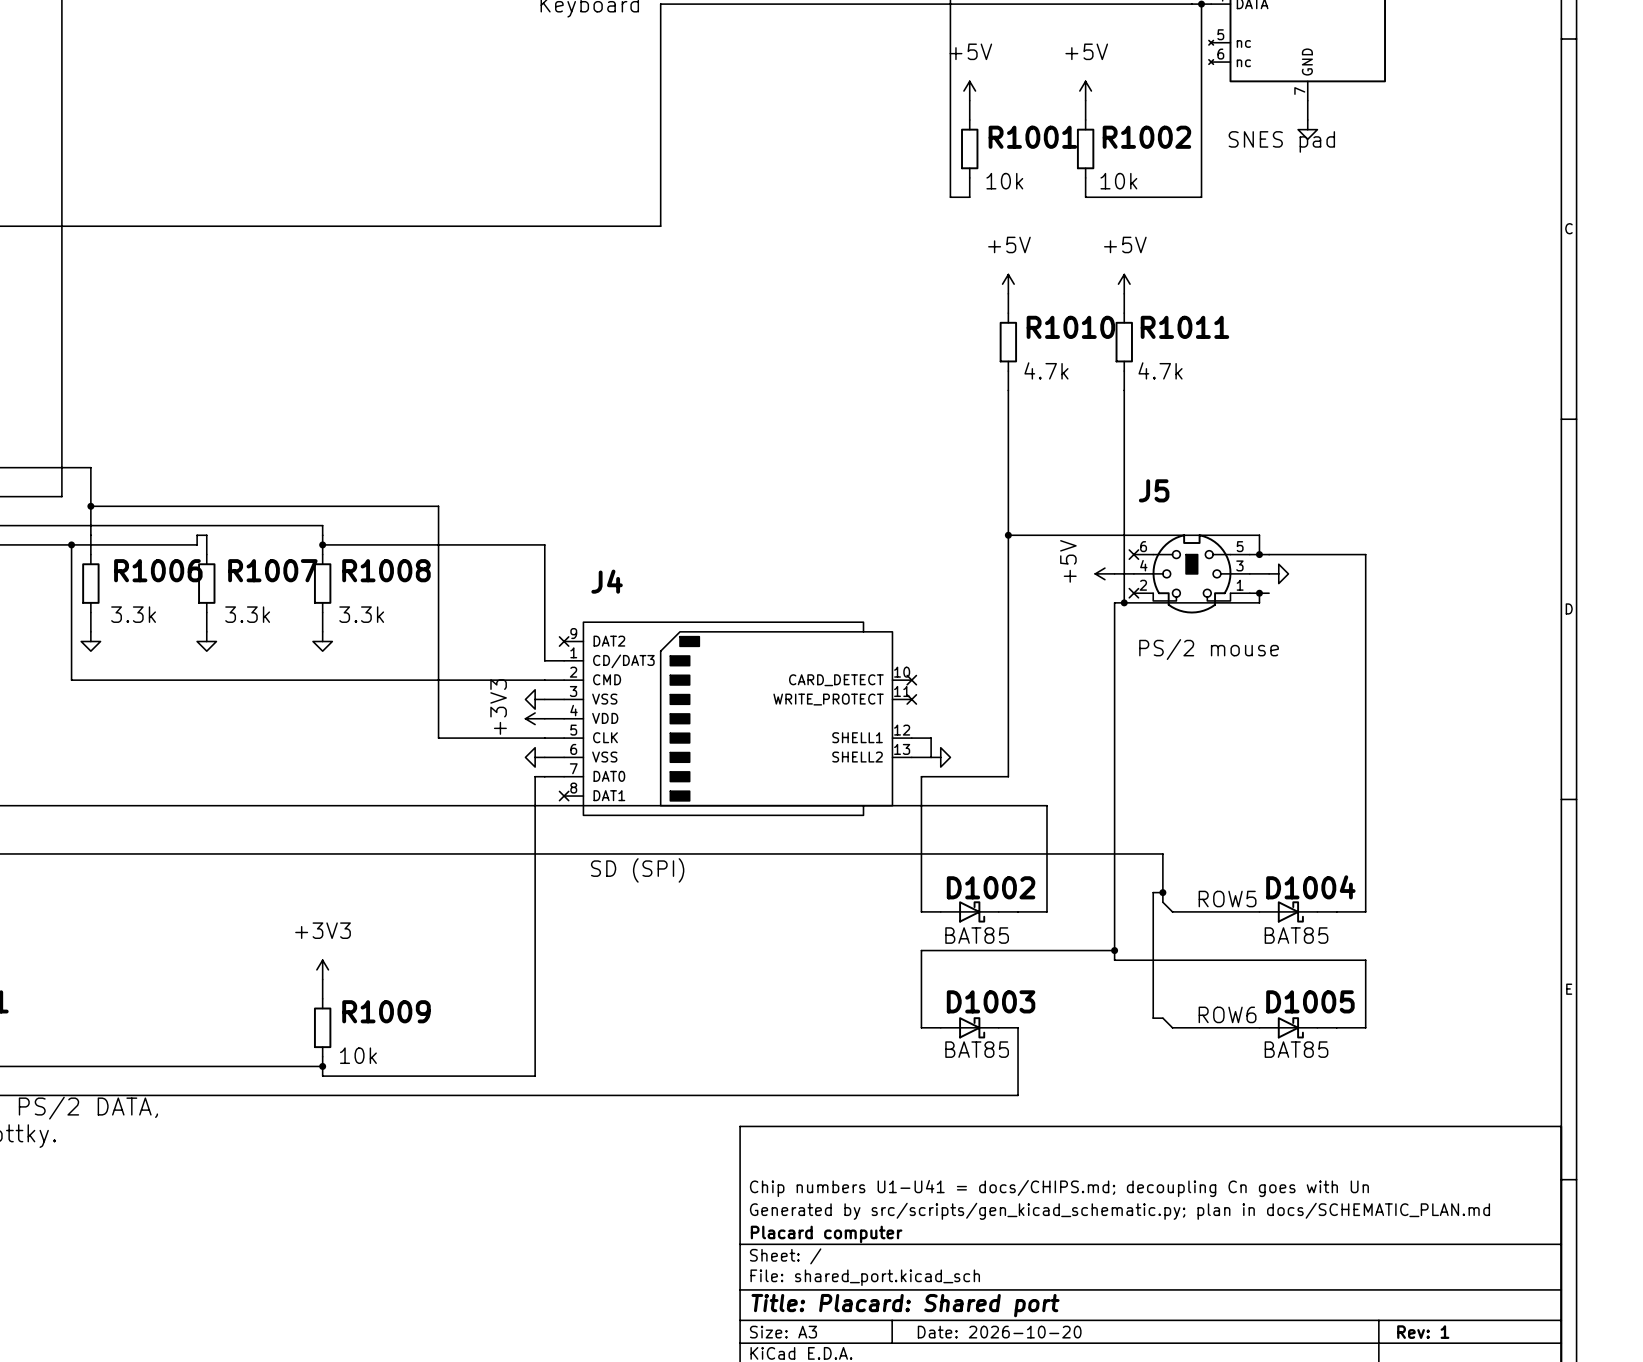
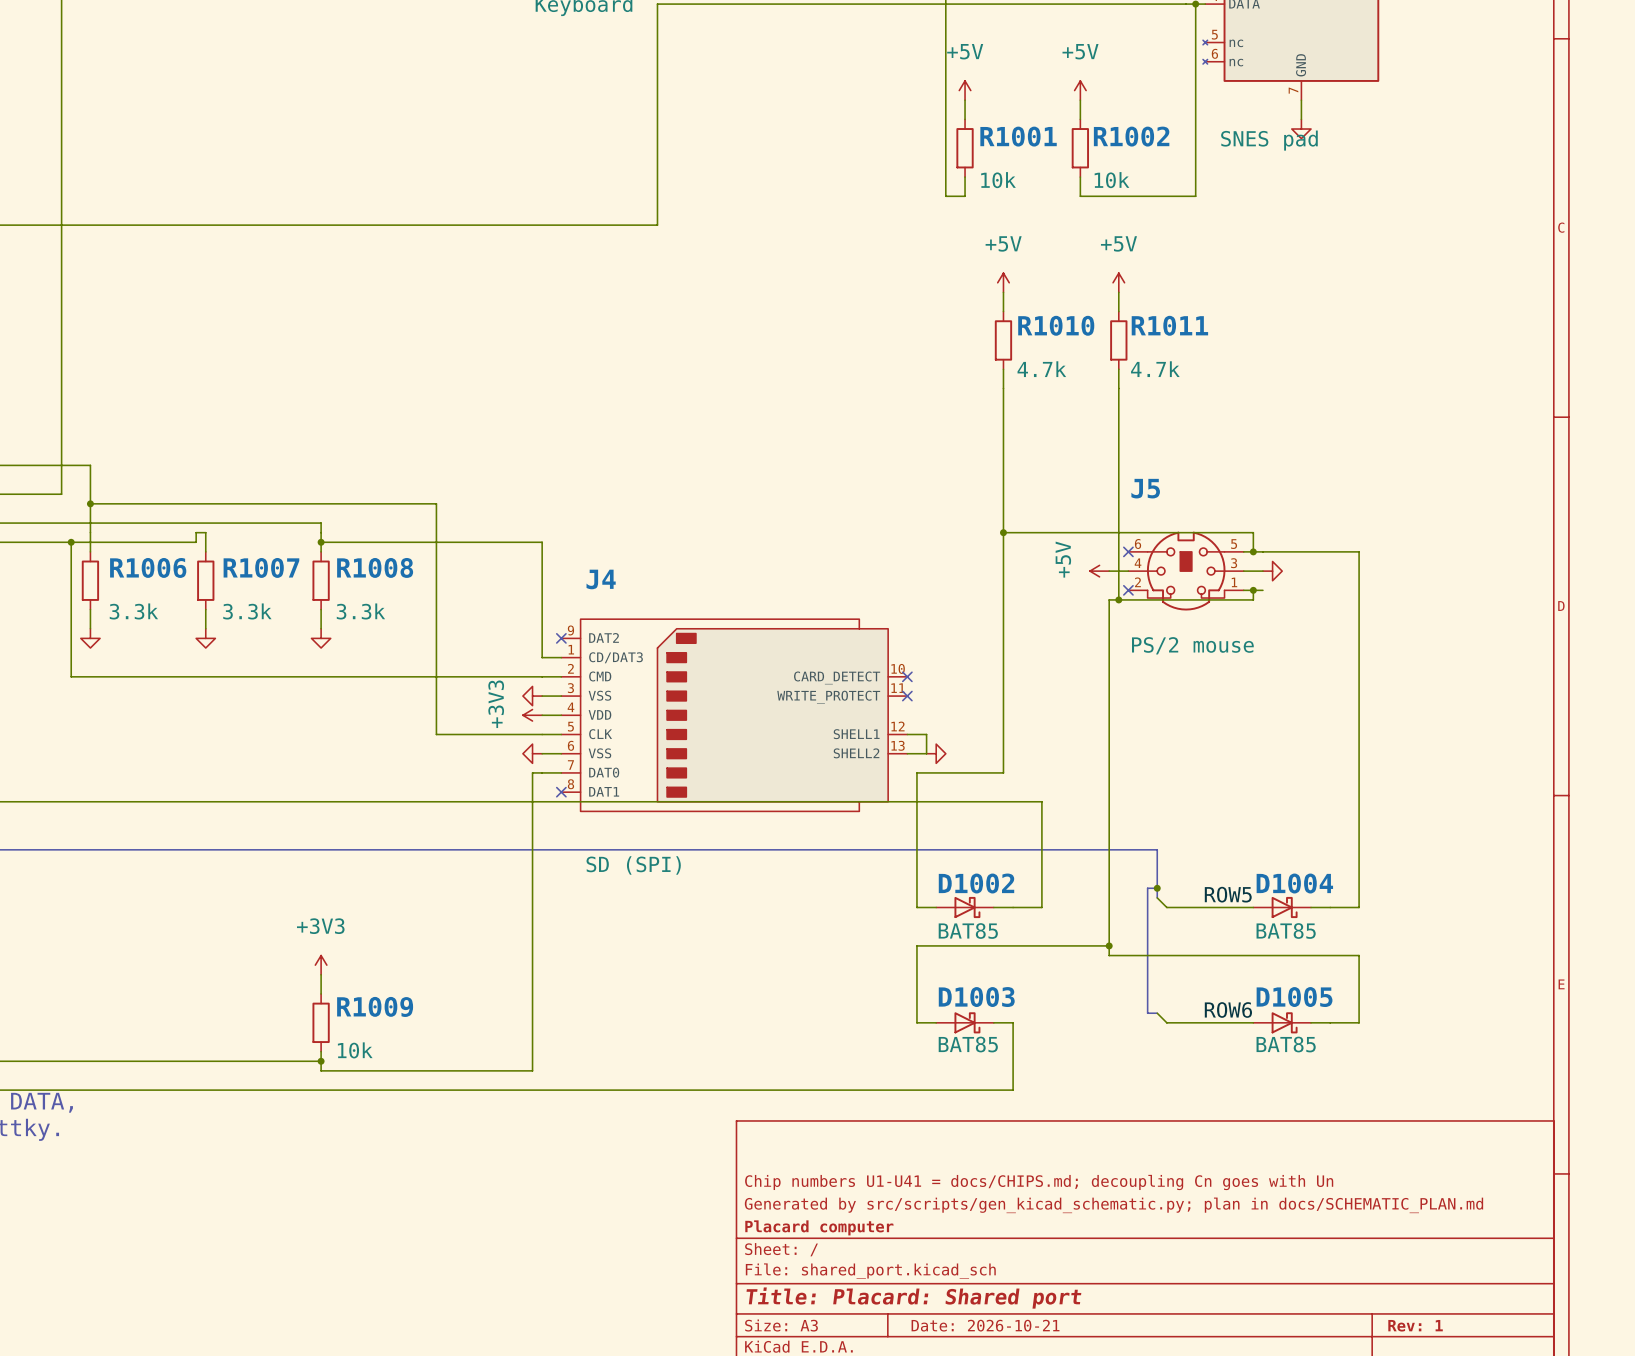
title block: Date: 2026-10-20 (999, 1332) -> Date: 2026-10-21 (985, 1325)

